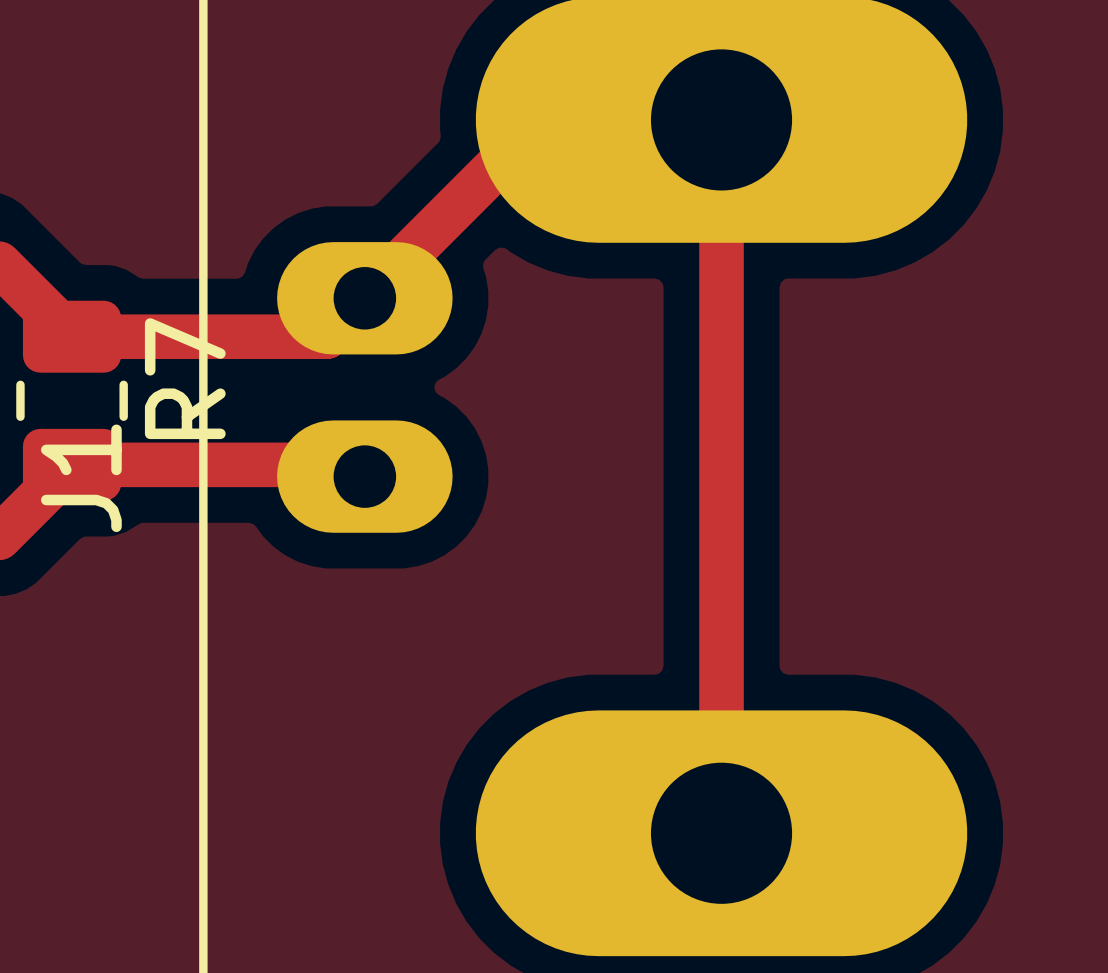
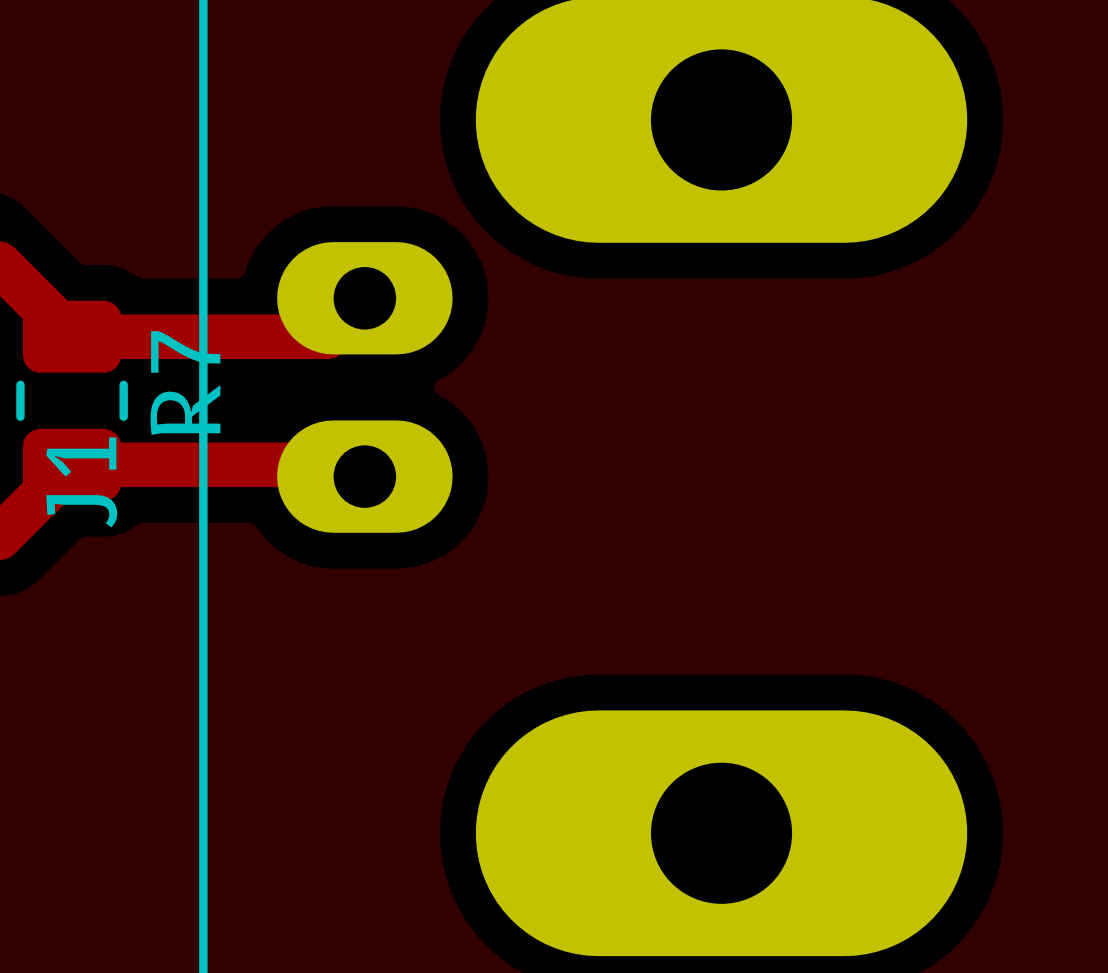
track: (364, 298) (543, 119) (721, 119) (721, 833) -> none

